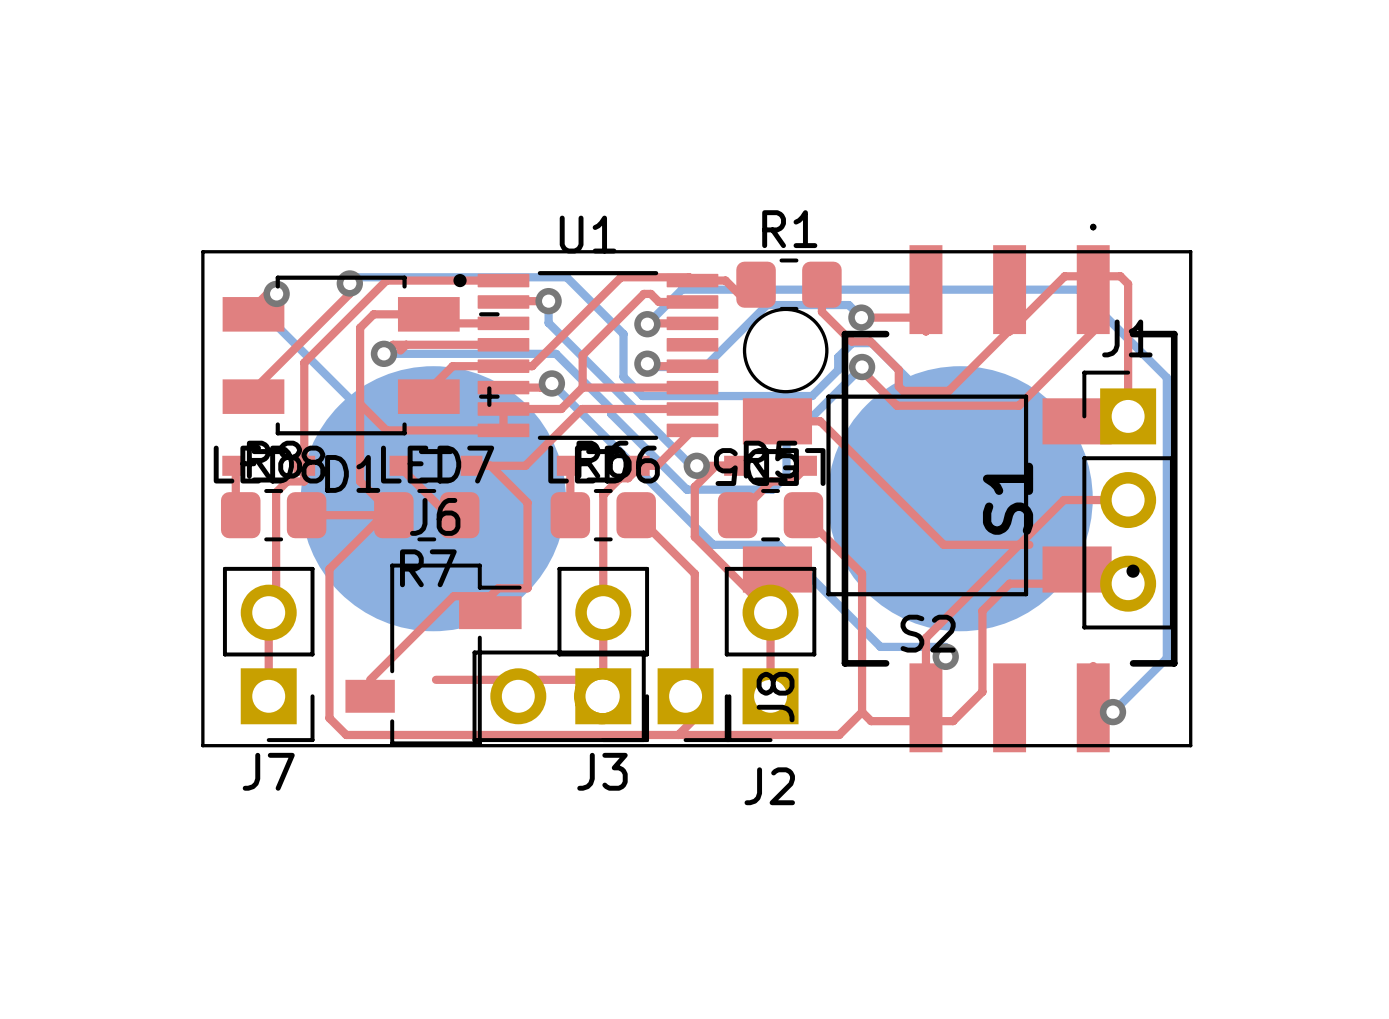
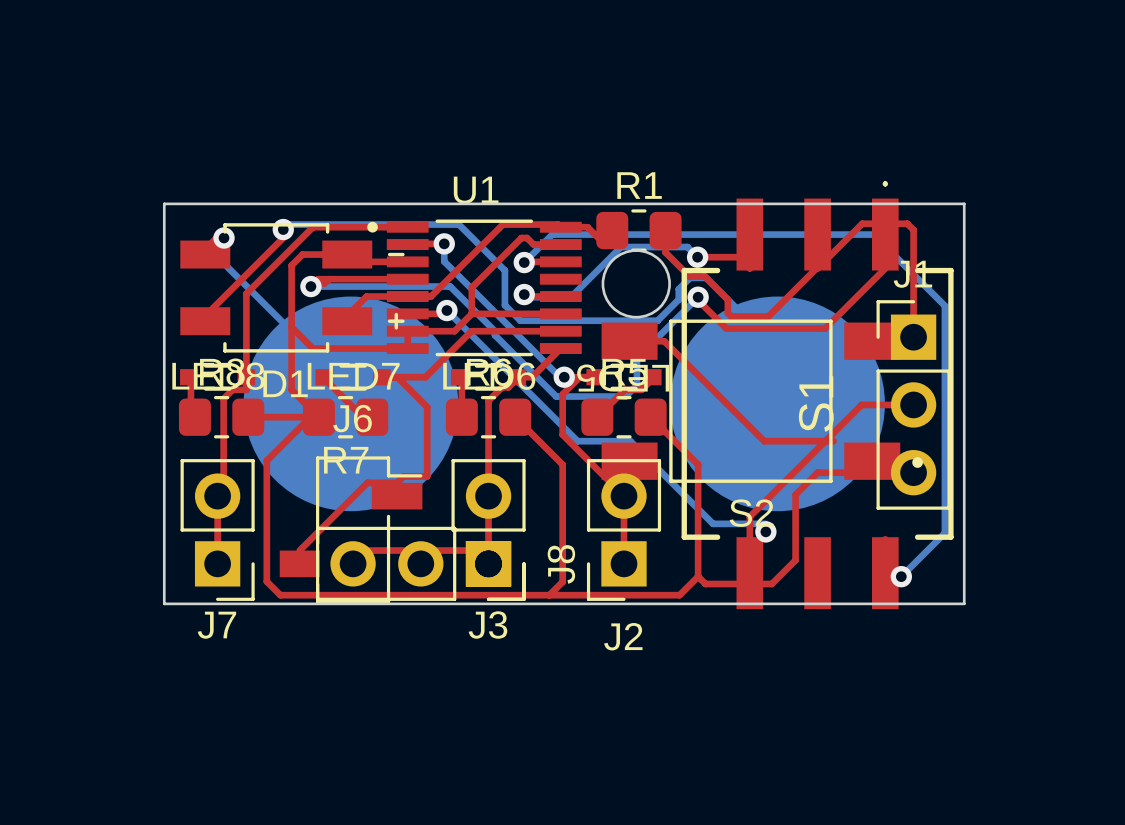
J8 position: (601, 696) -> (420, 563)

